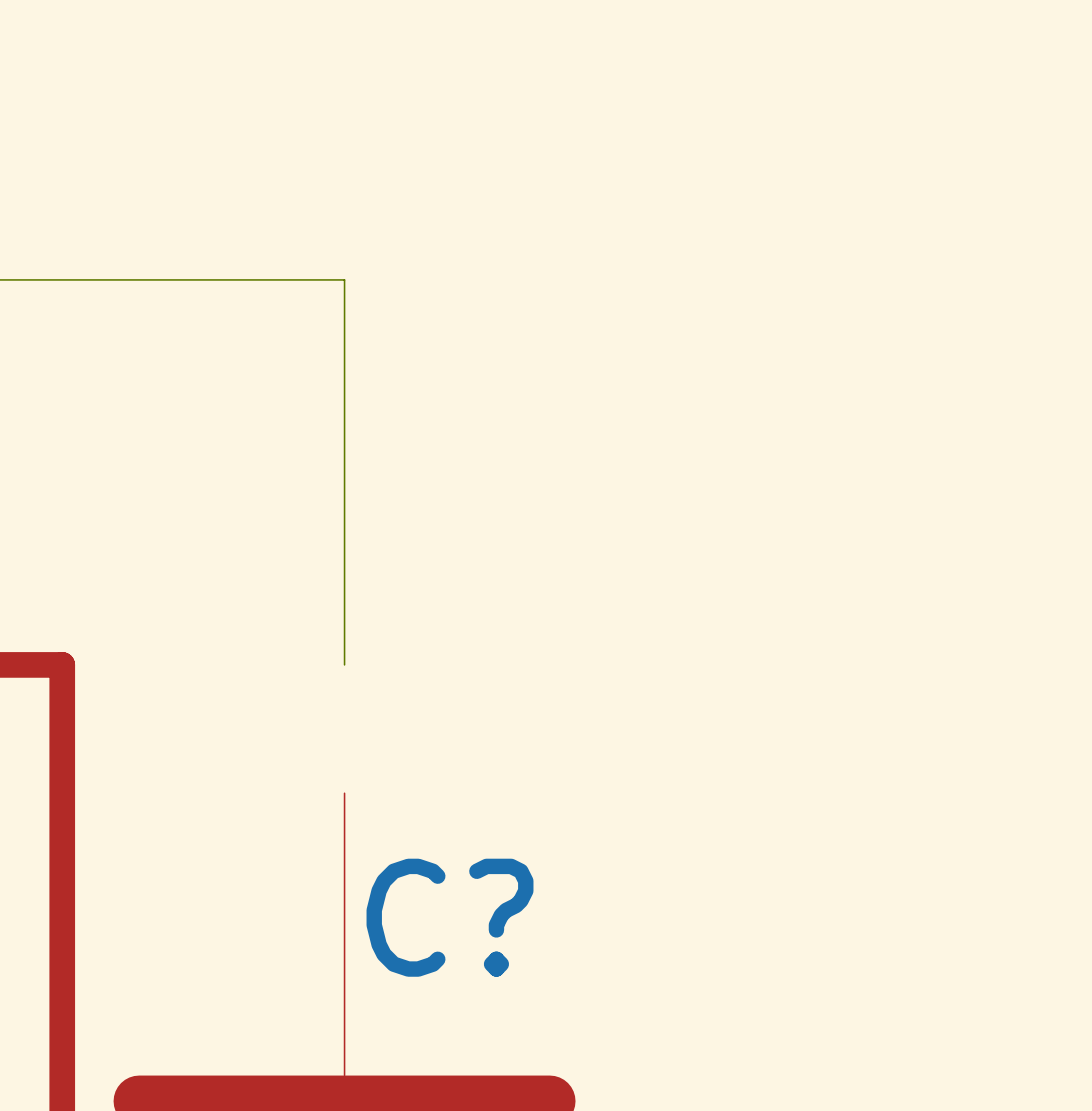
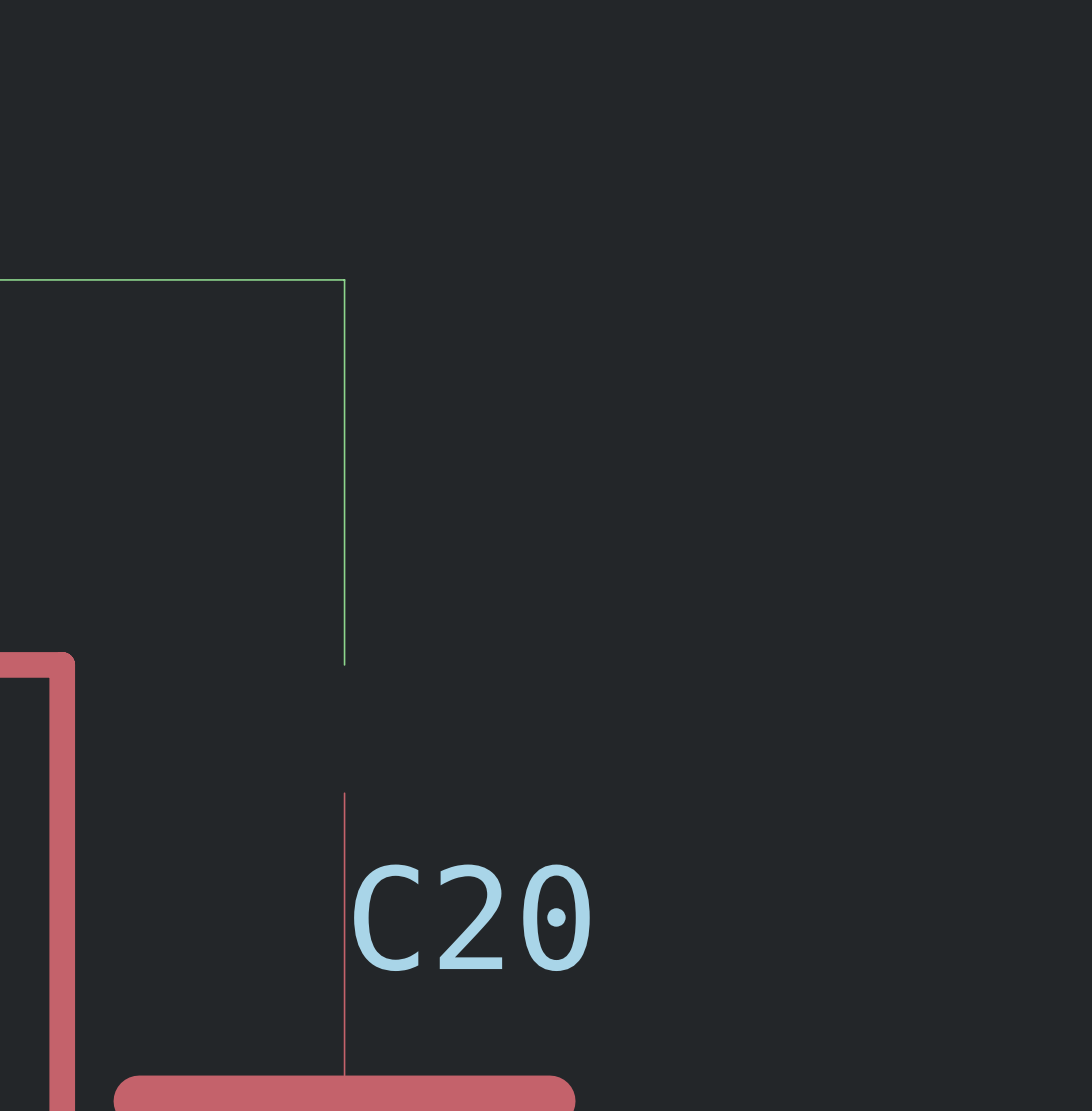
C? name: C? (450, 917) -> C20 (471, 917)

